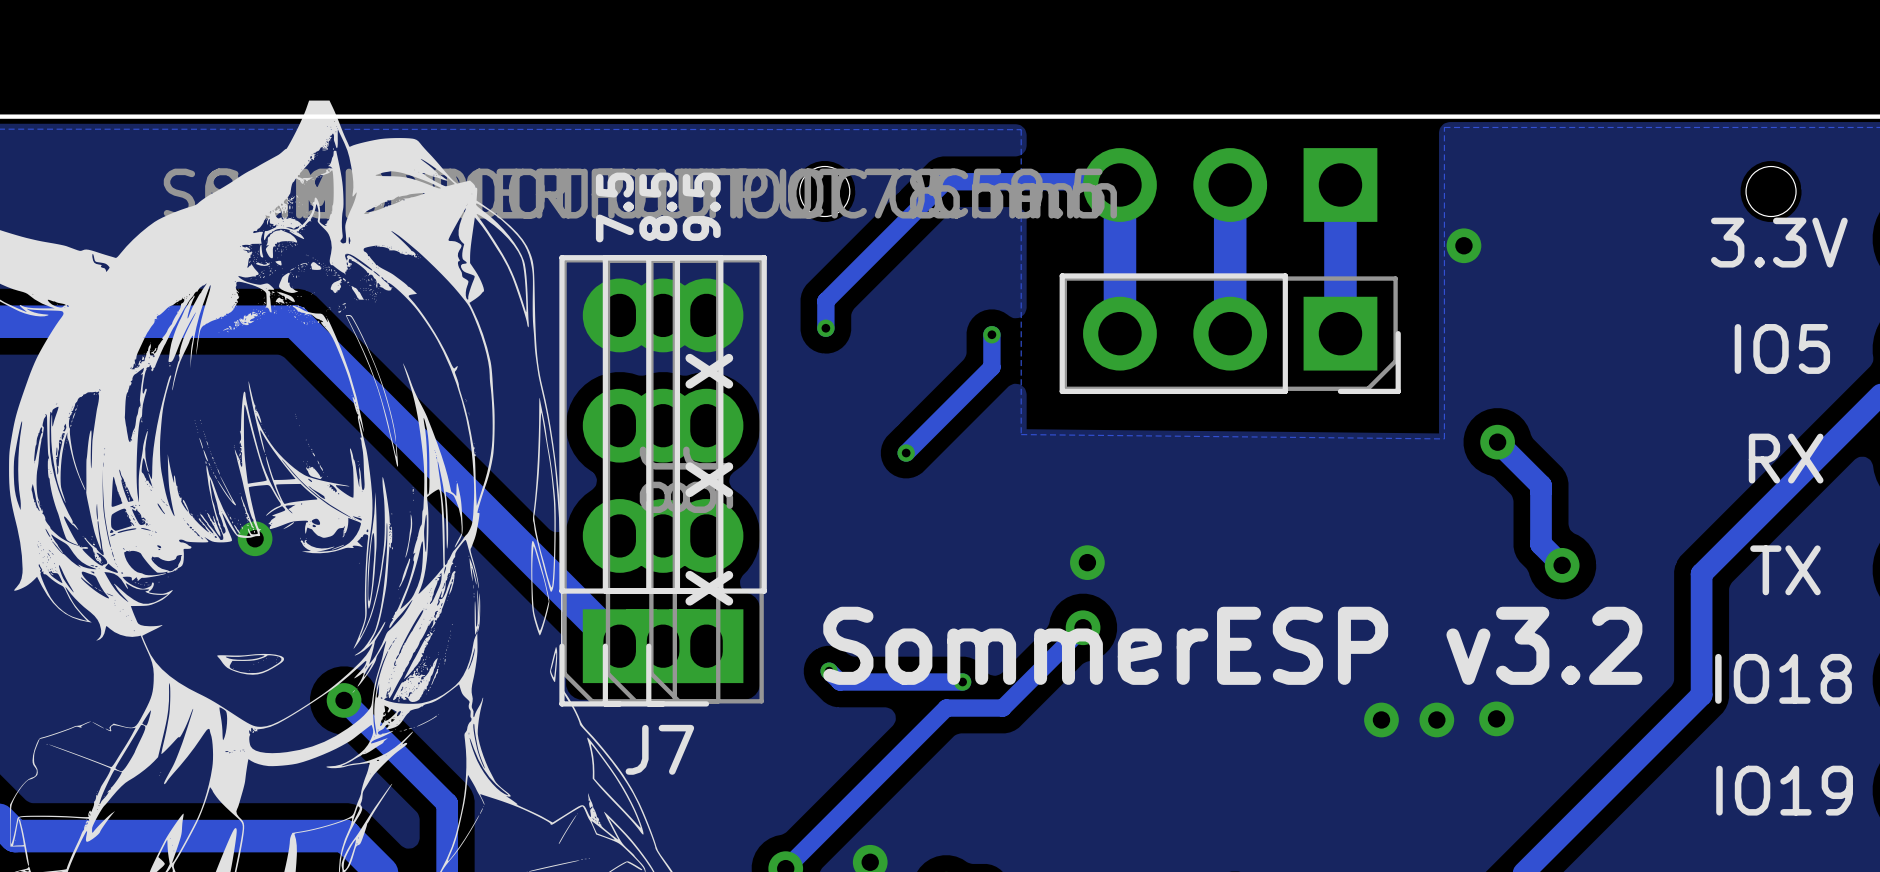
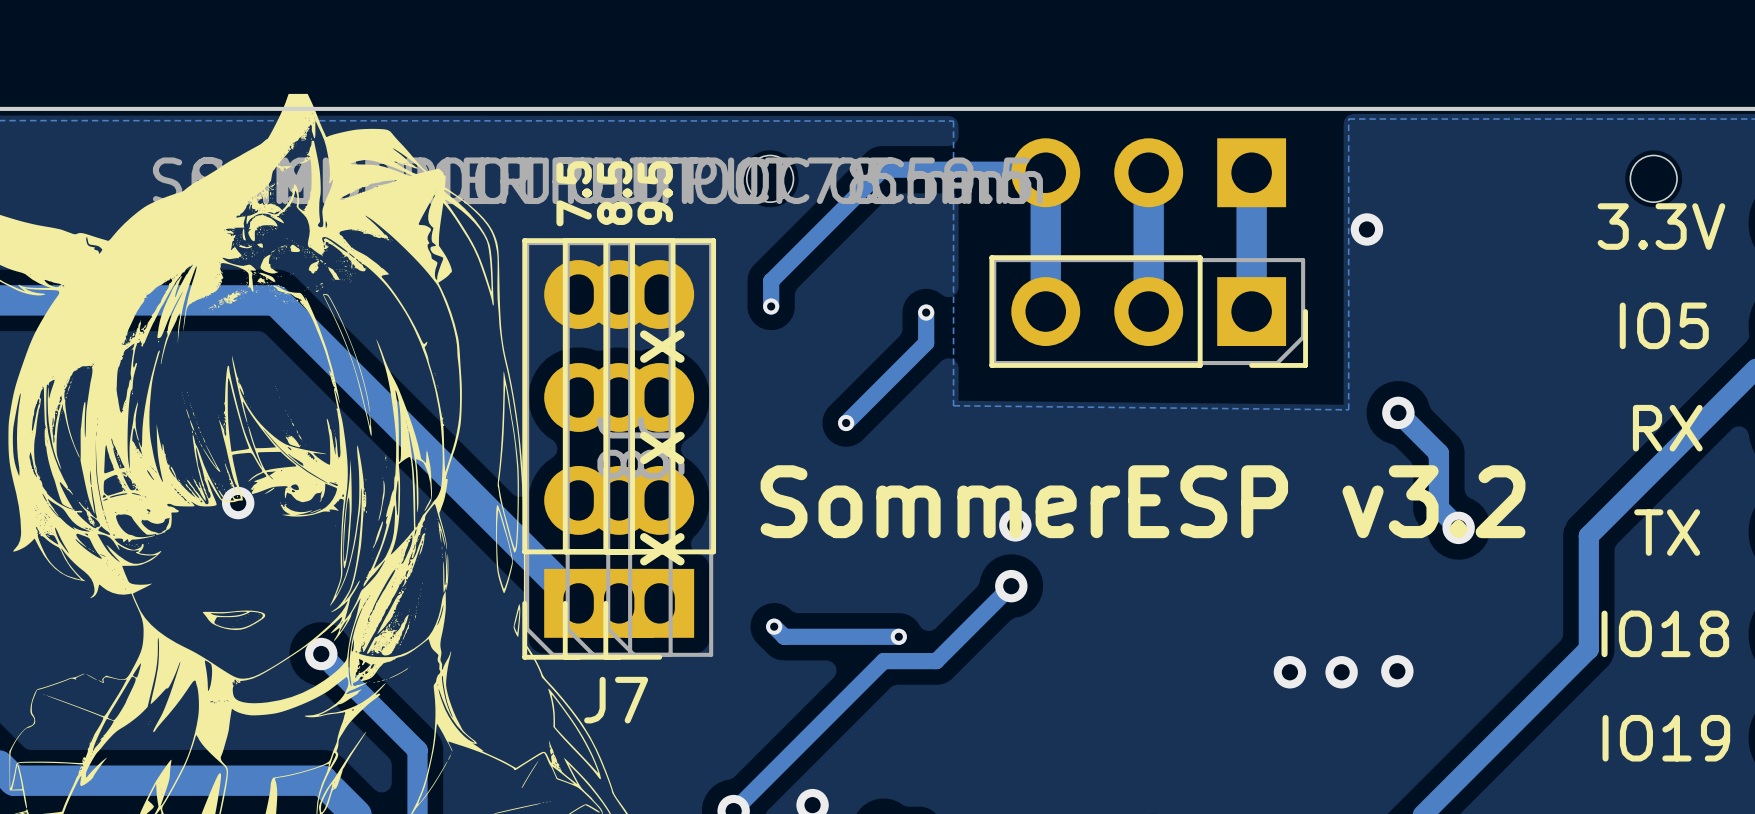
text position: SommerESP v3.2 (1232, 645) -> SommerESP v3.2 (1143, 501)

